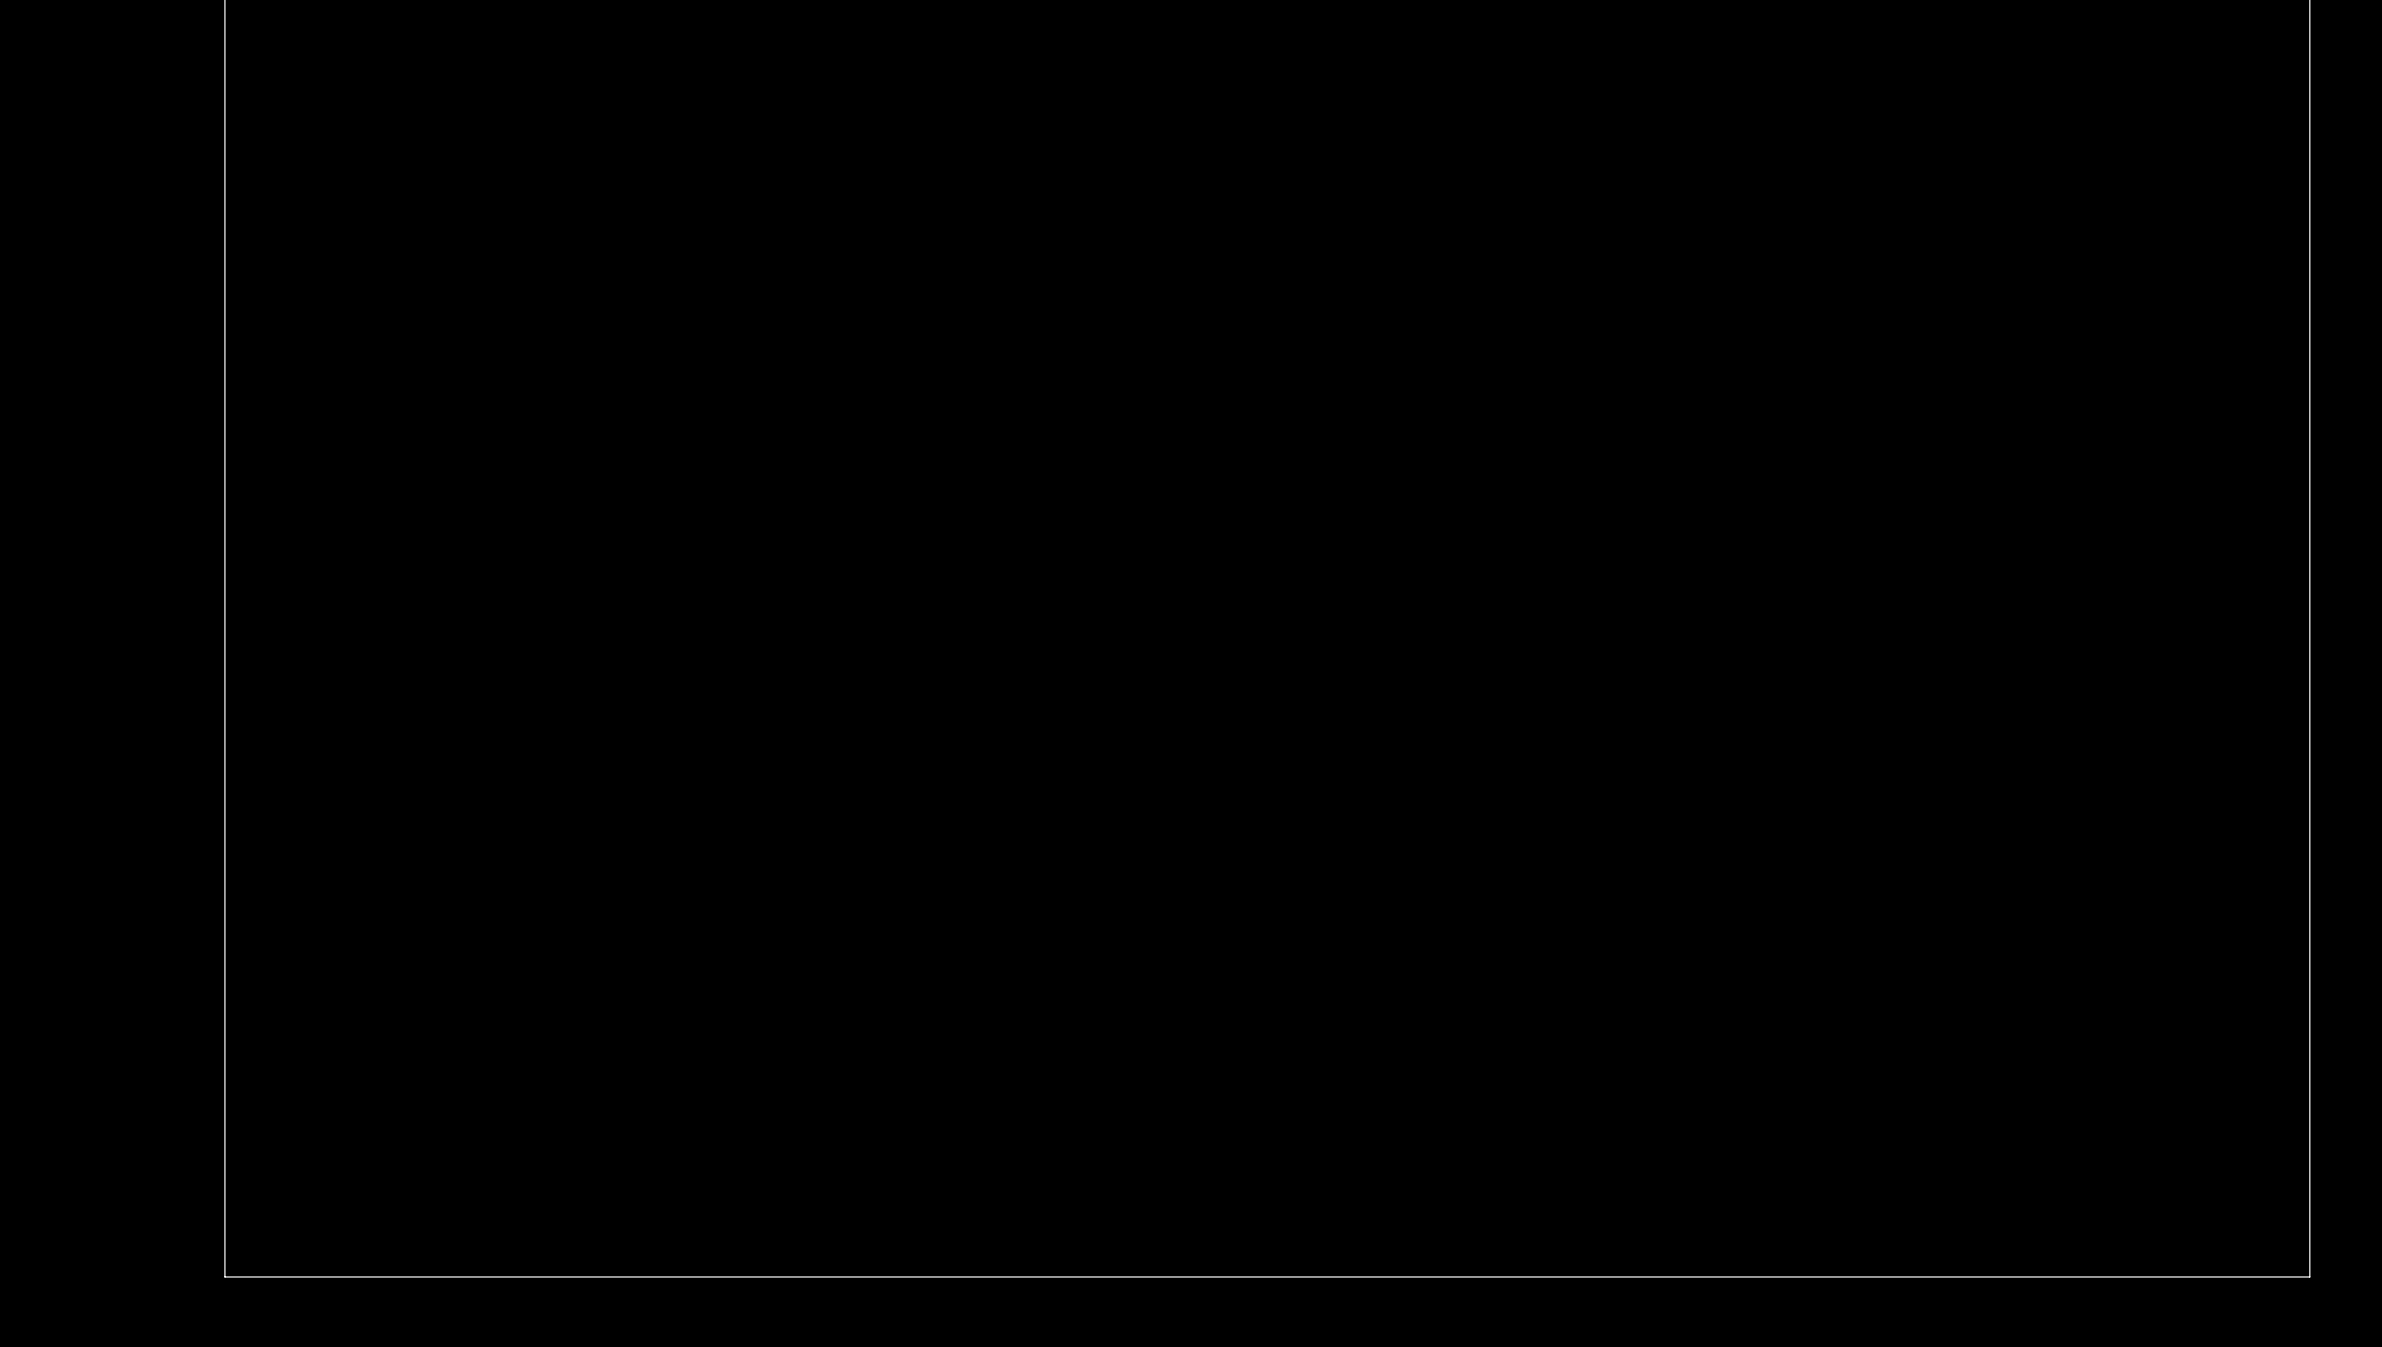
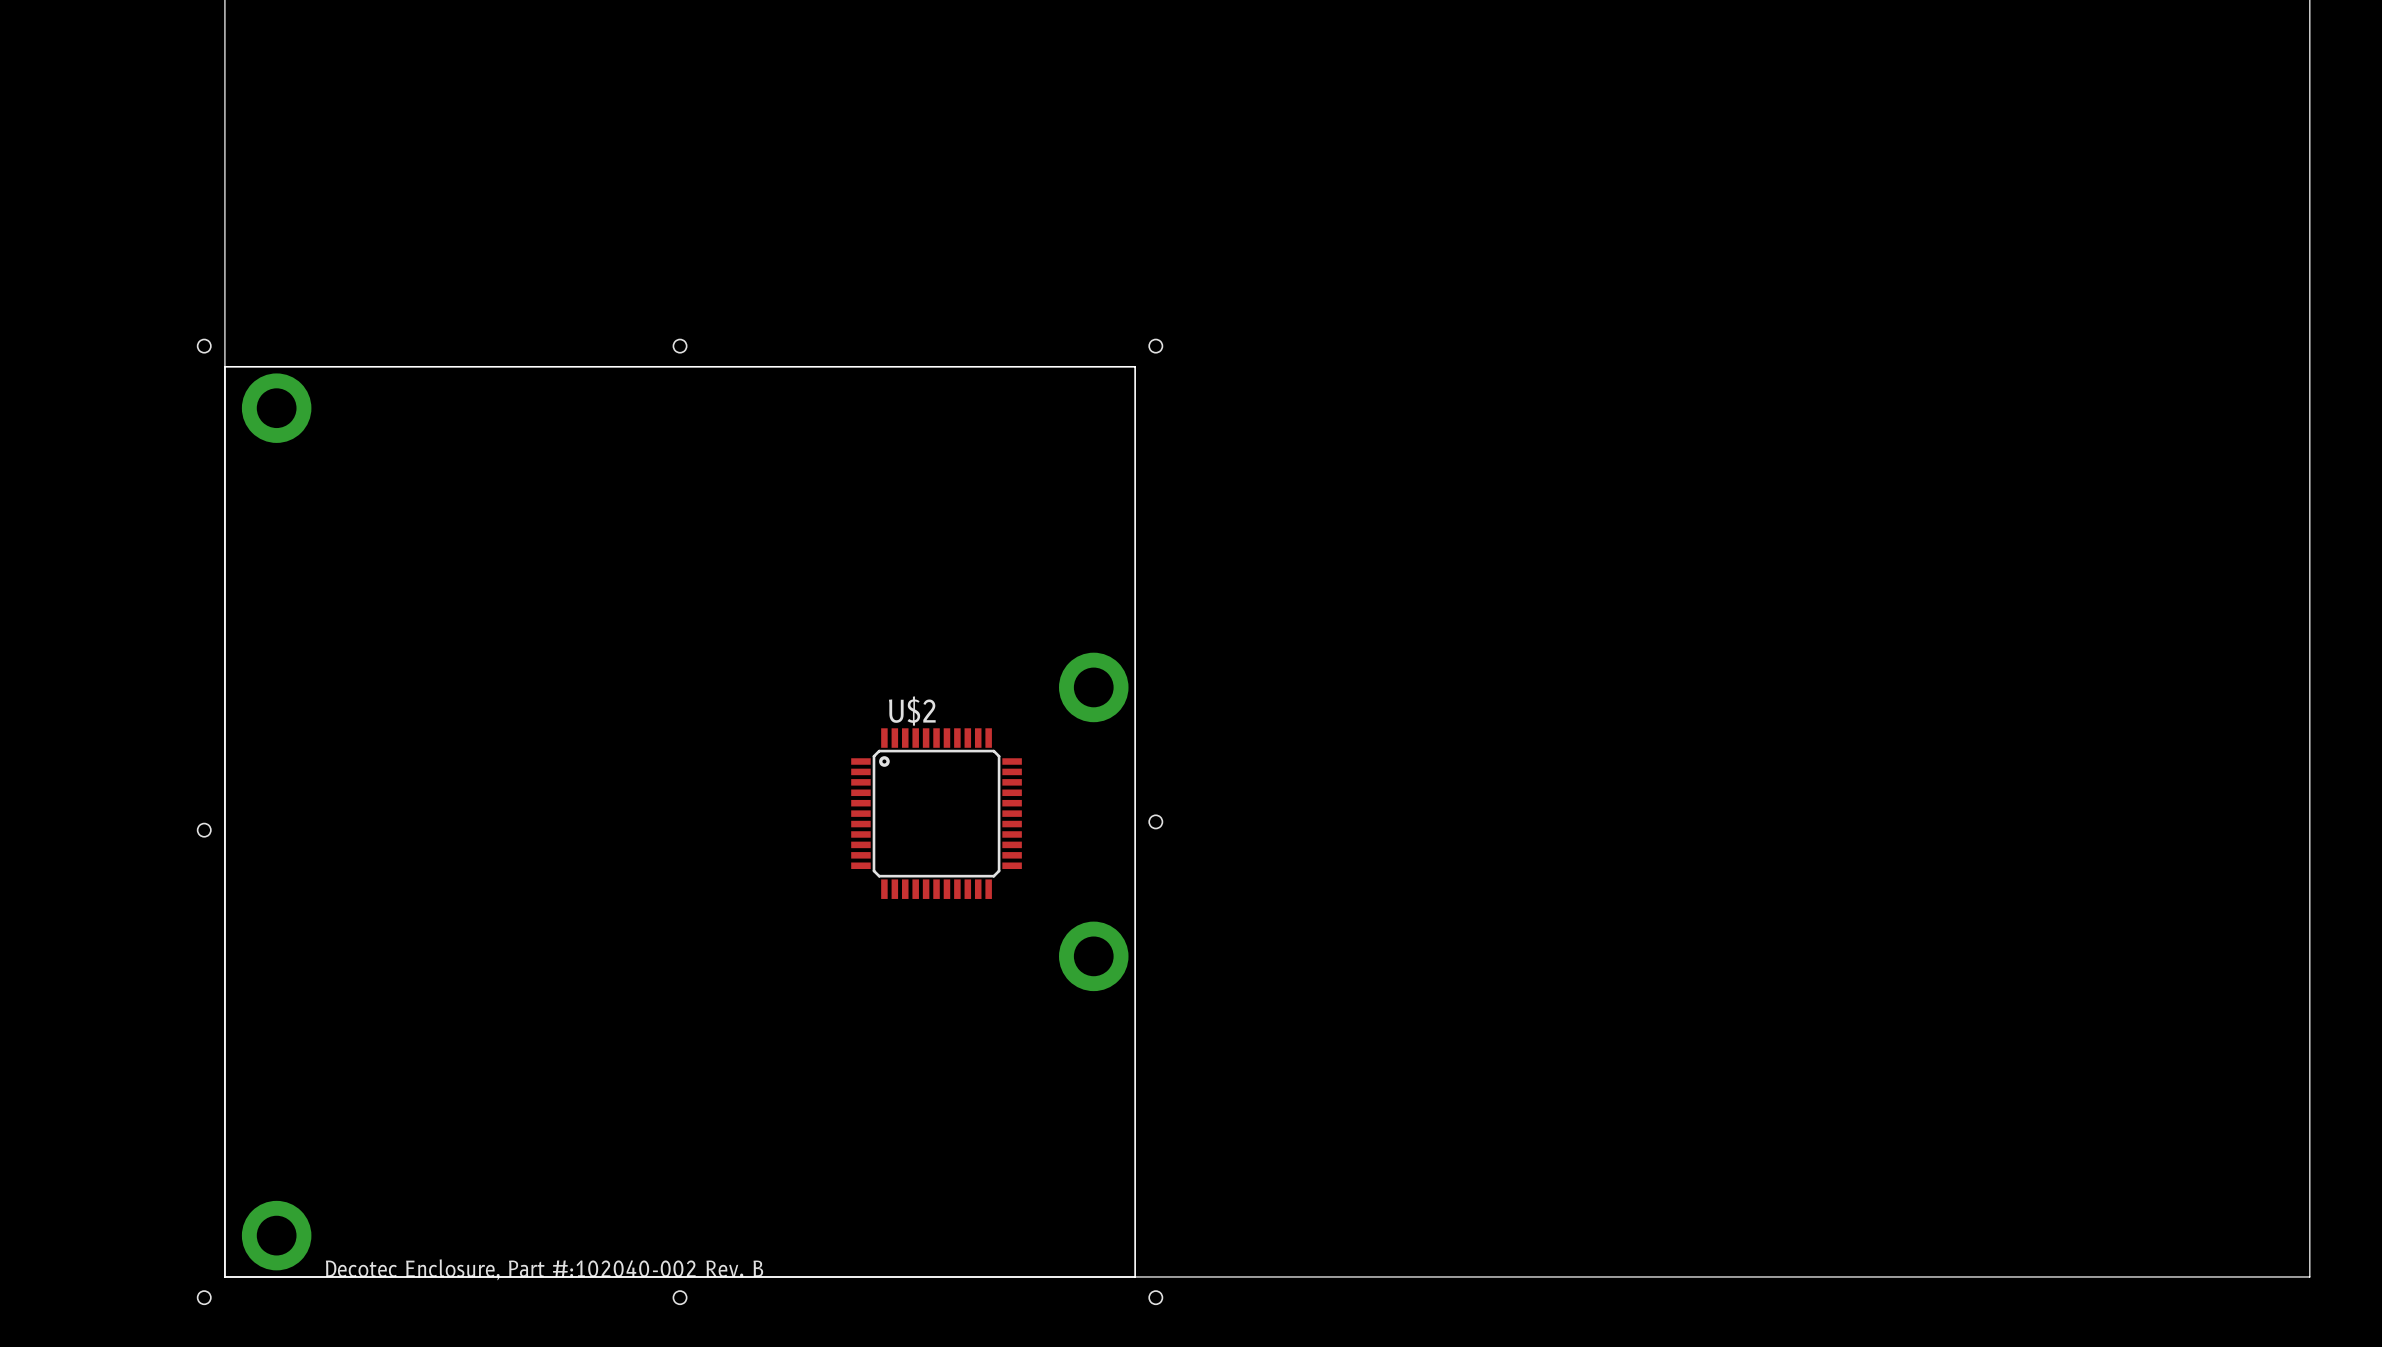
U$2: none -> (936, 813)
part: none -> (680, 821)

